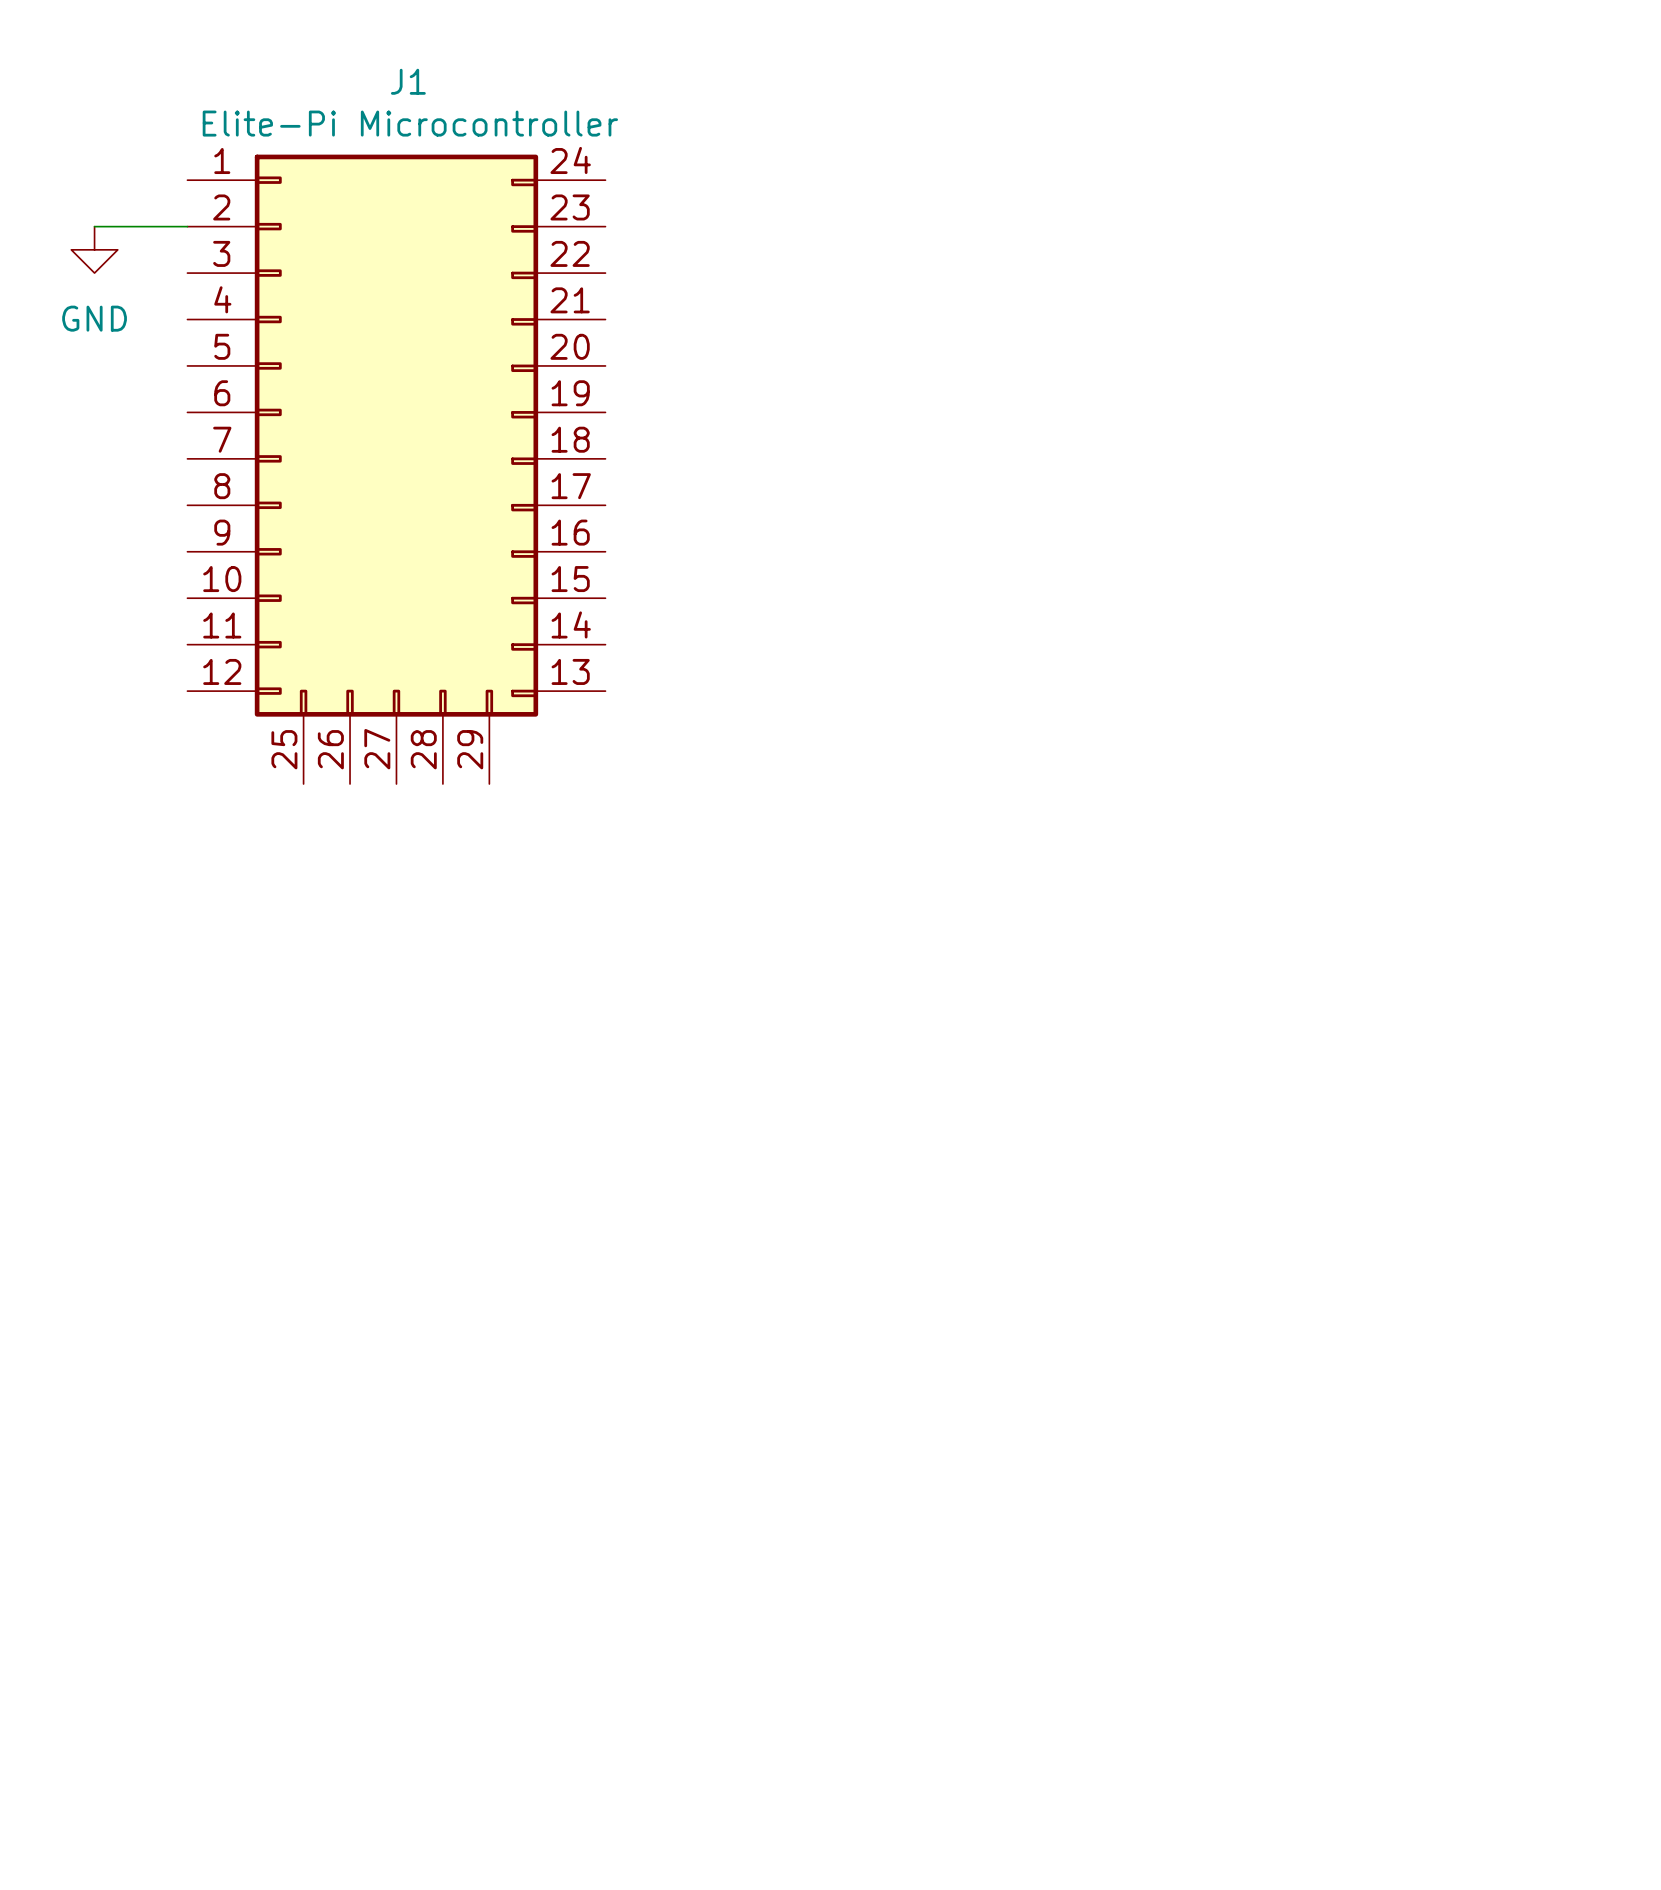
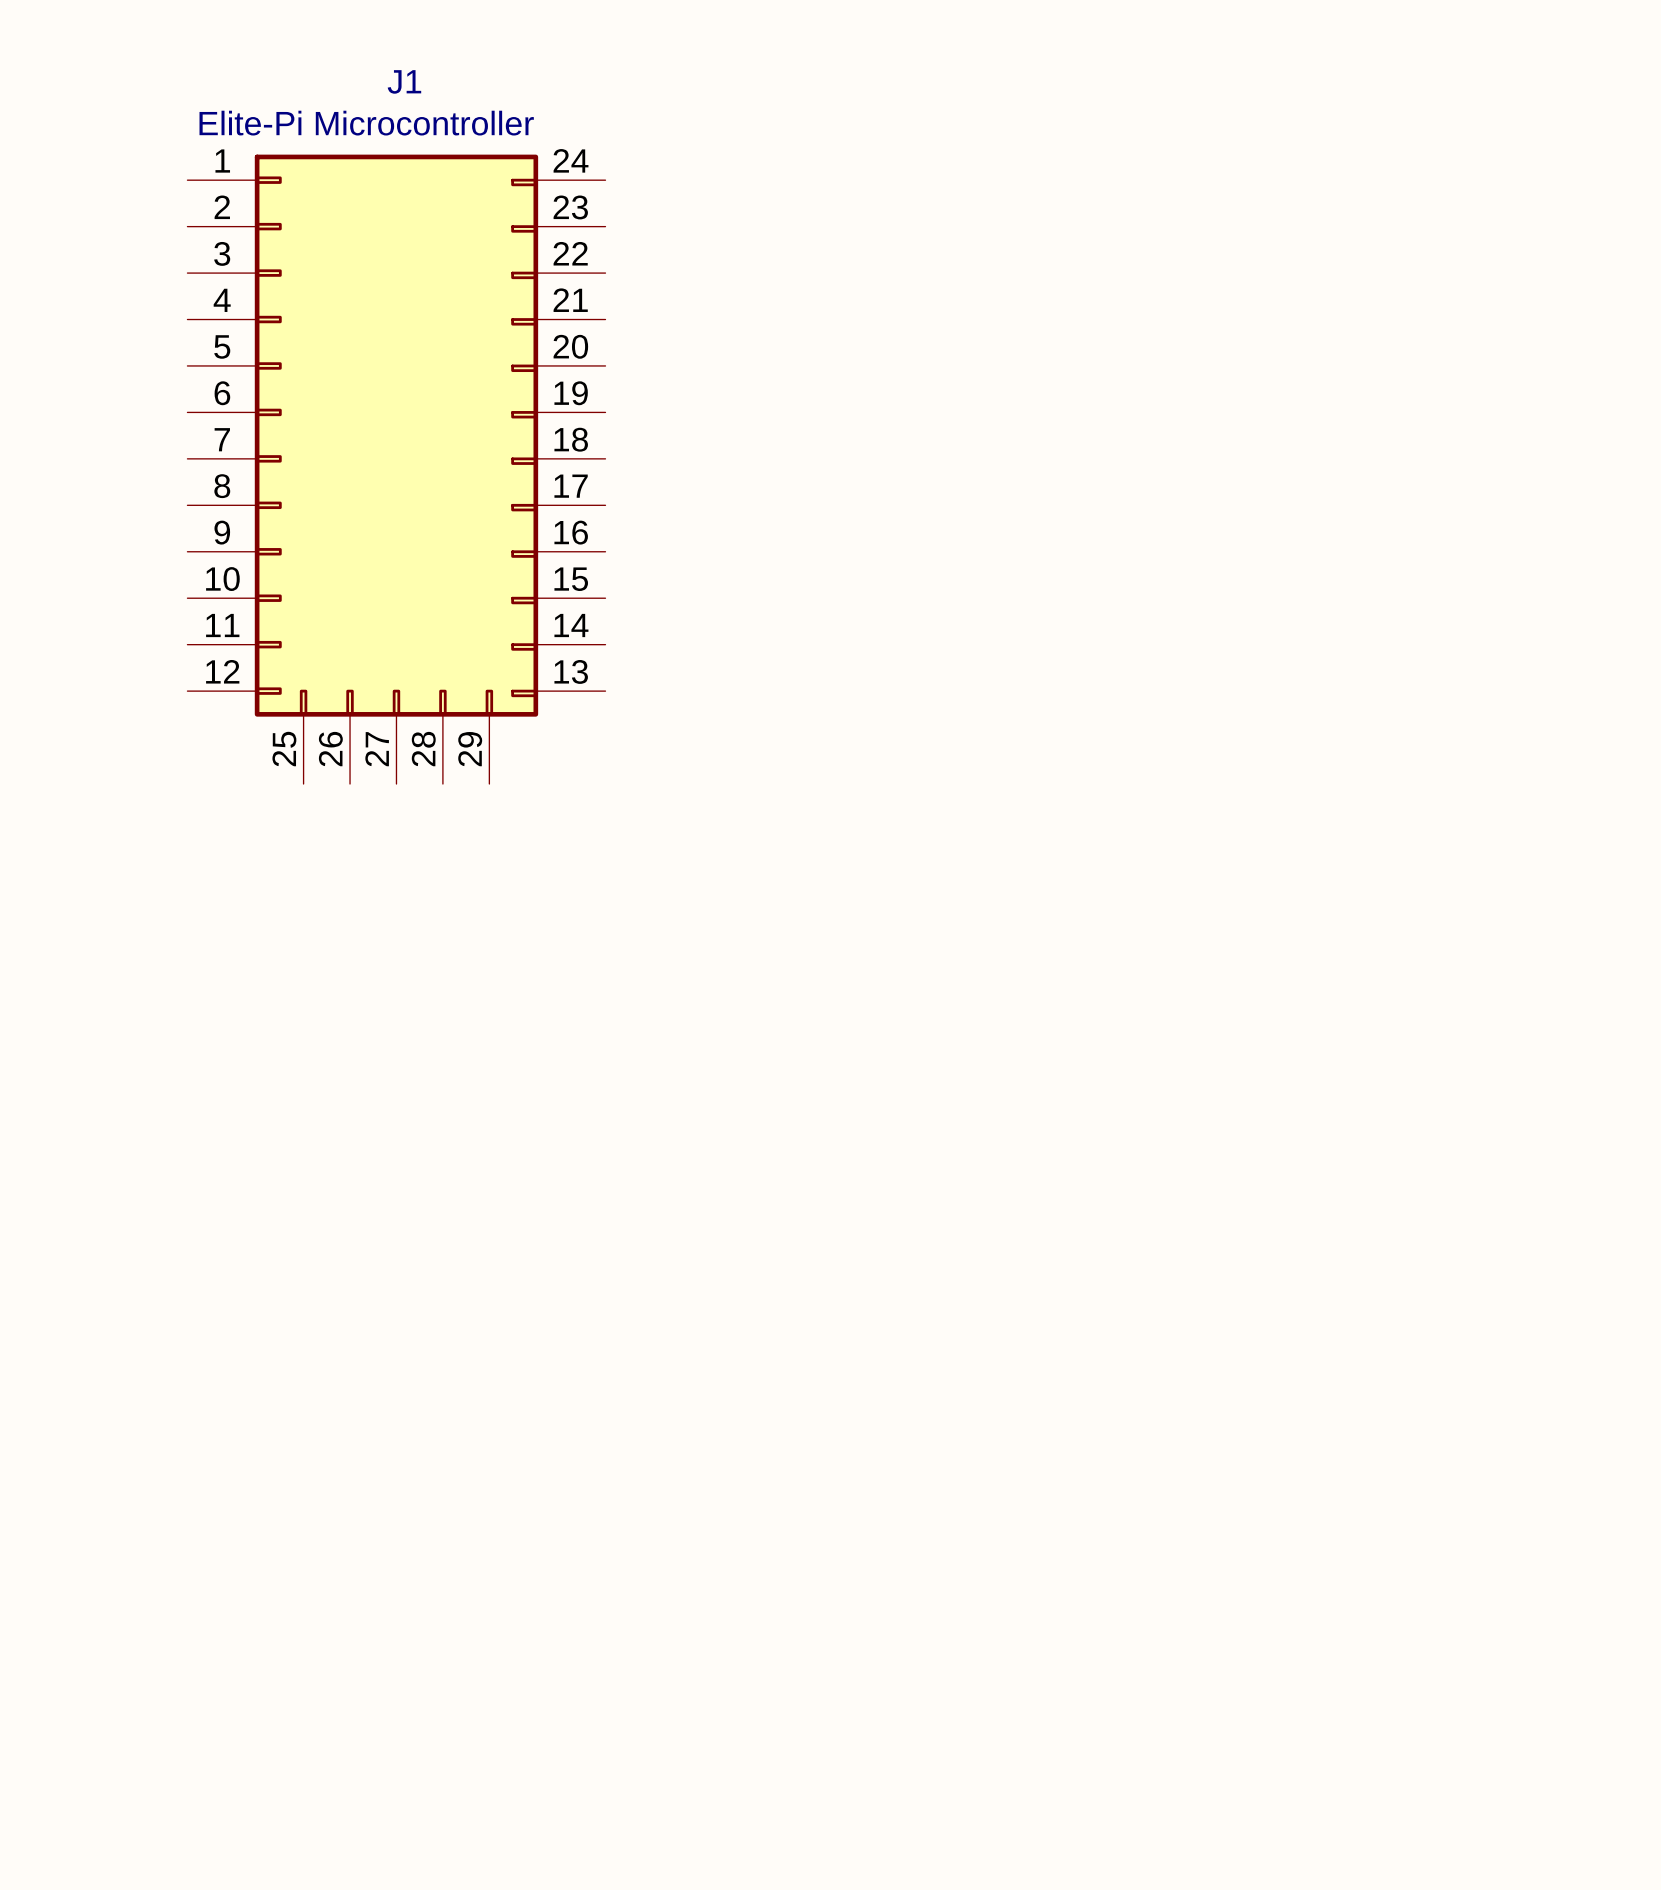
wire: (94, 226) (187, 226) -> none
power symbol: GND (94, 249) -> none

